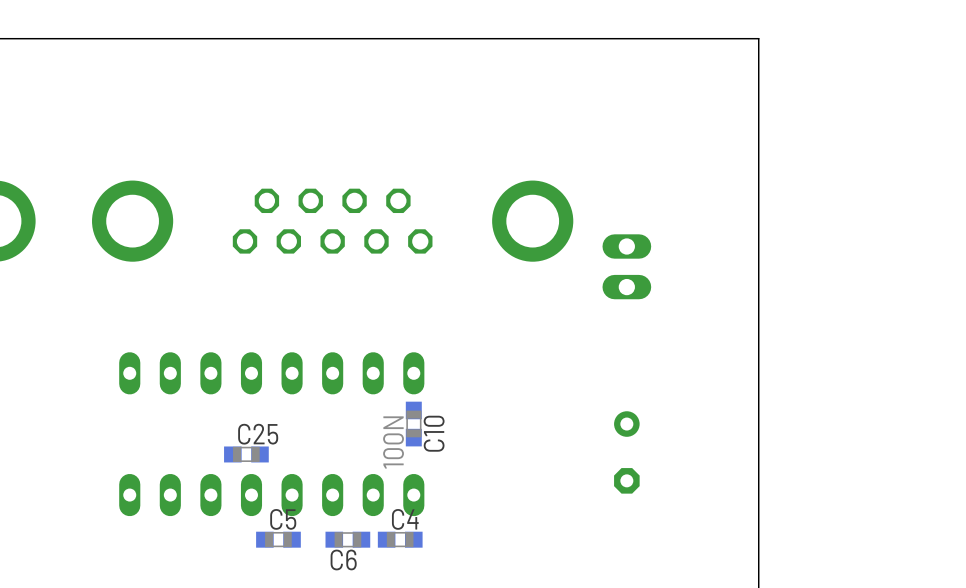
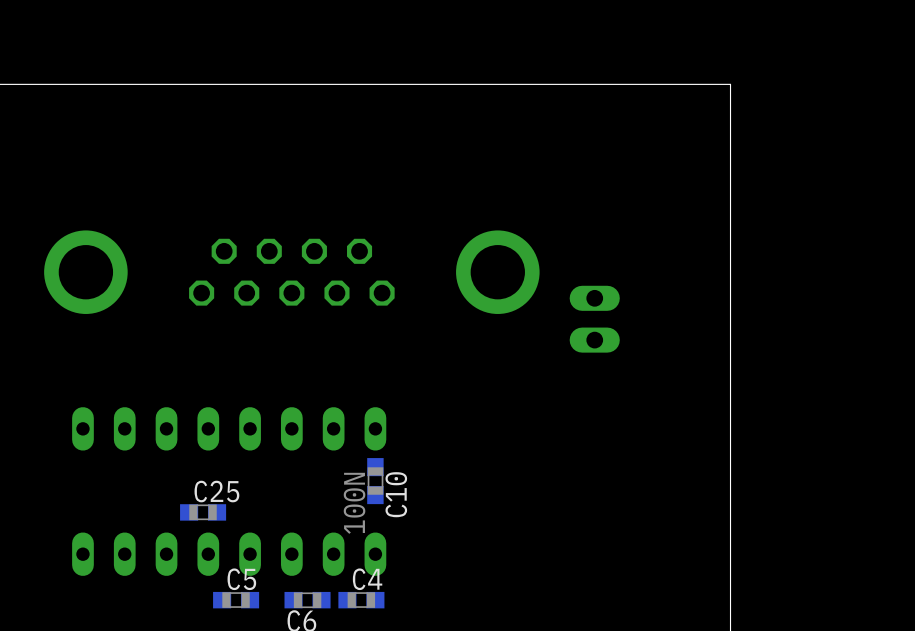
part: (626, 452) -> none

